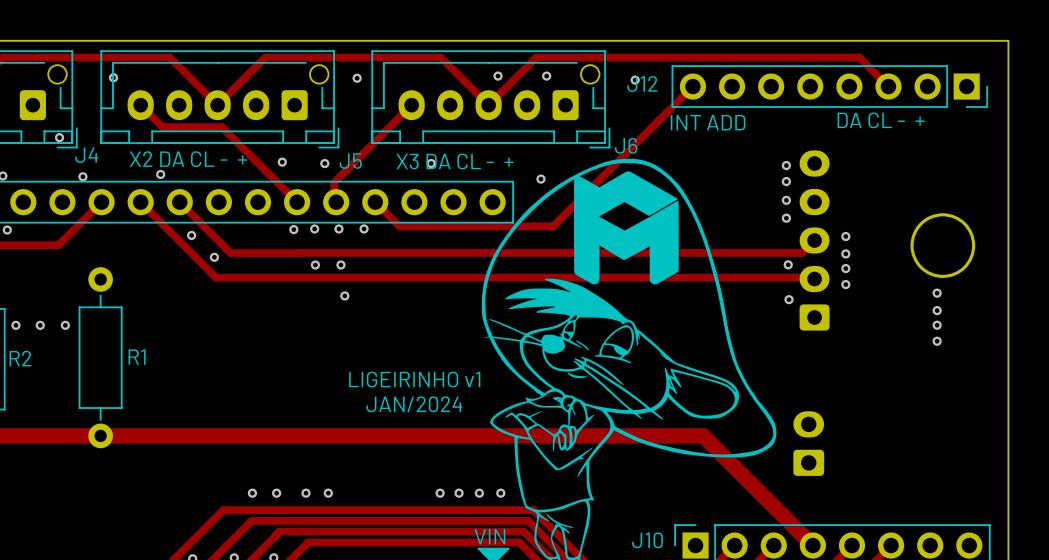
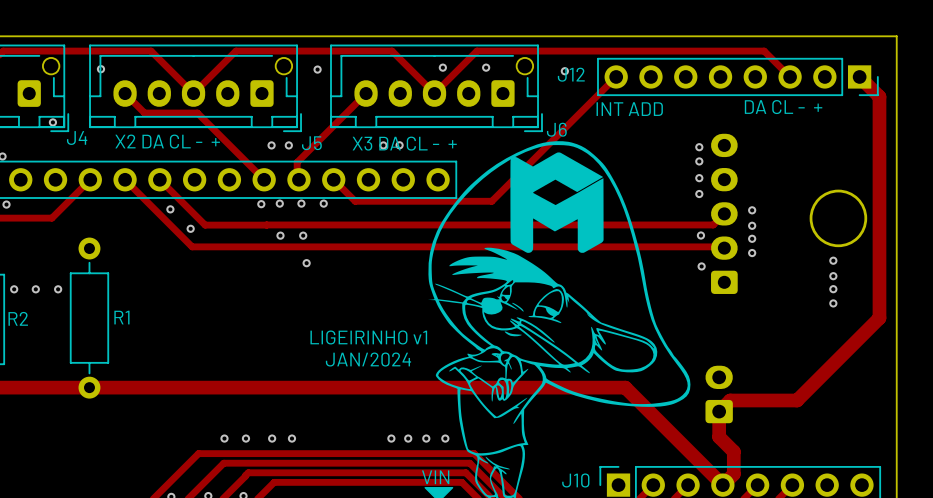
track: none -> (859, 76) (879, 96) (879, 318) (797, 400) (730, 400) (719, 411) (719, 437) (733, 451) (733, 474) (722, 485)
via position: (282, 162) -> (271, 145)
via: none -> (399, 145)
via: (160, 174) -> none
via: (82, 176) -> none
via: (540, 179) -> none

